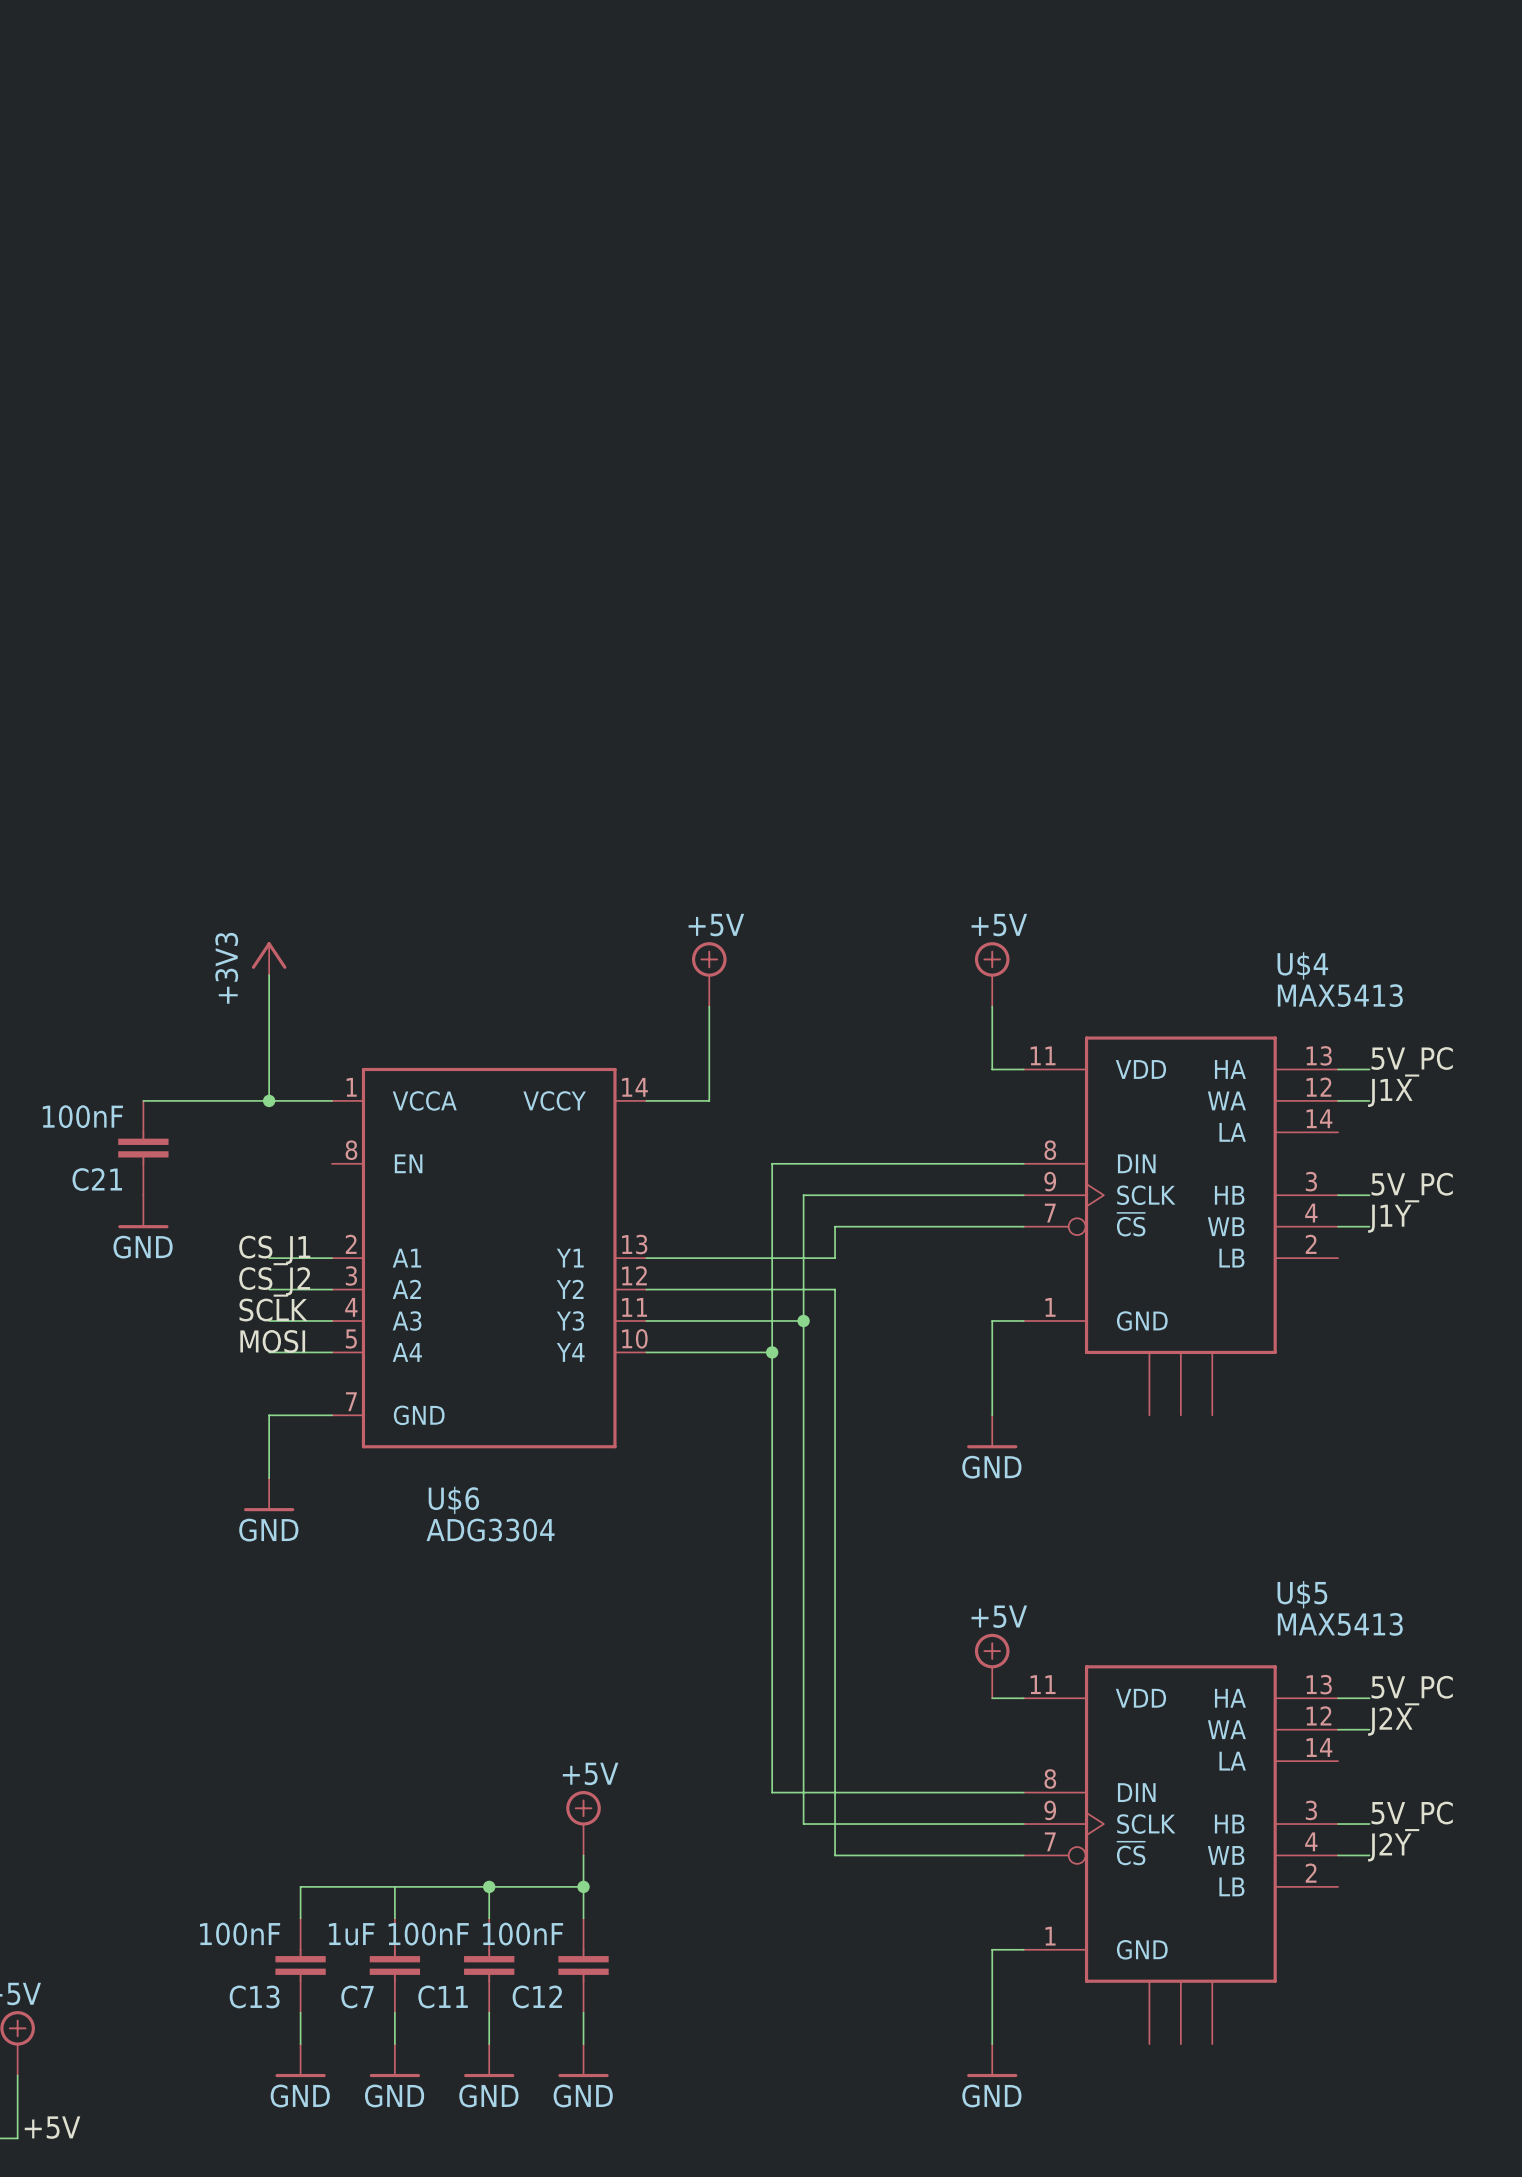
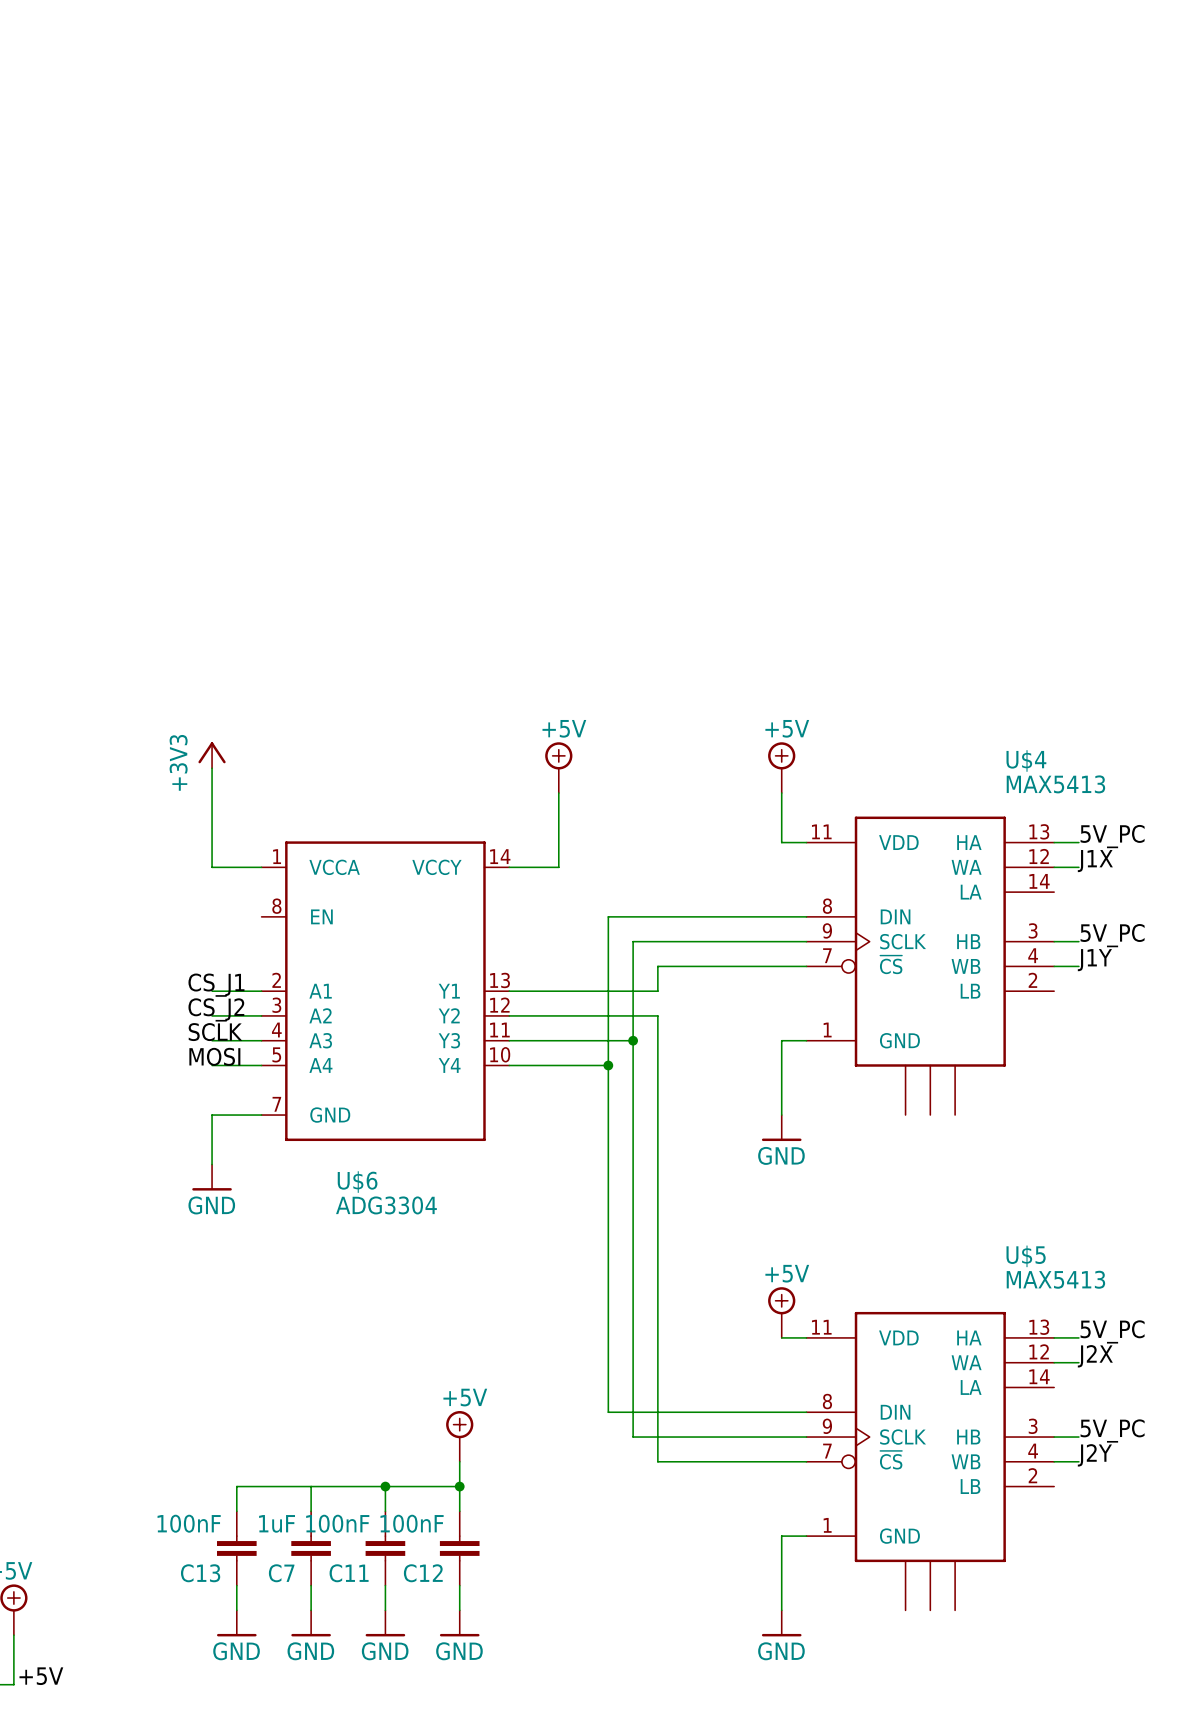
wire: (143, 1100) (269, 1100) -> none
junction: (269, 1100) -> none
C21: 100nF (143, 1148) -> none
power symbol: GND (143, 1211) -> none

